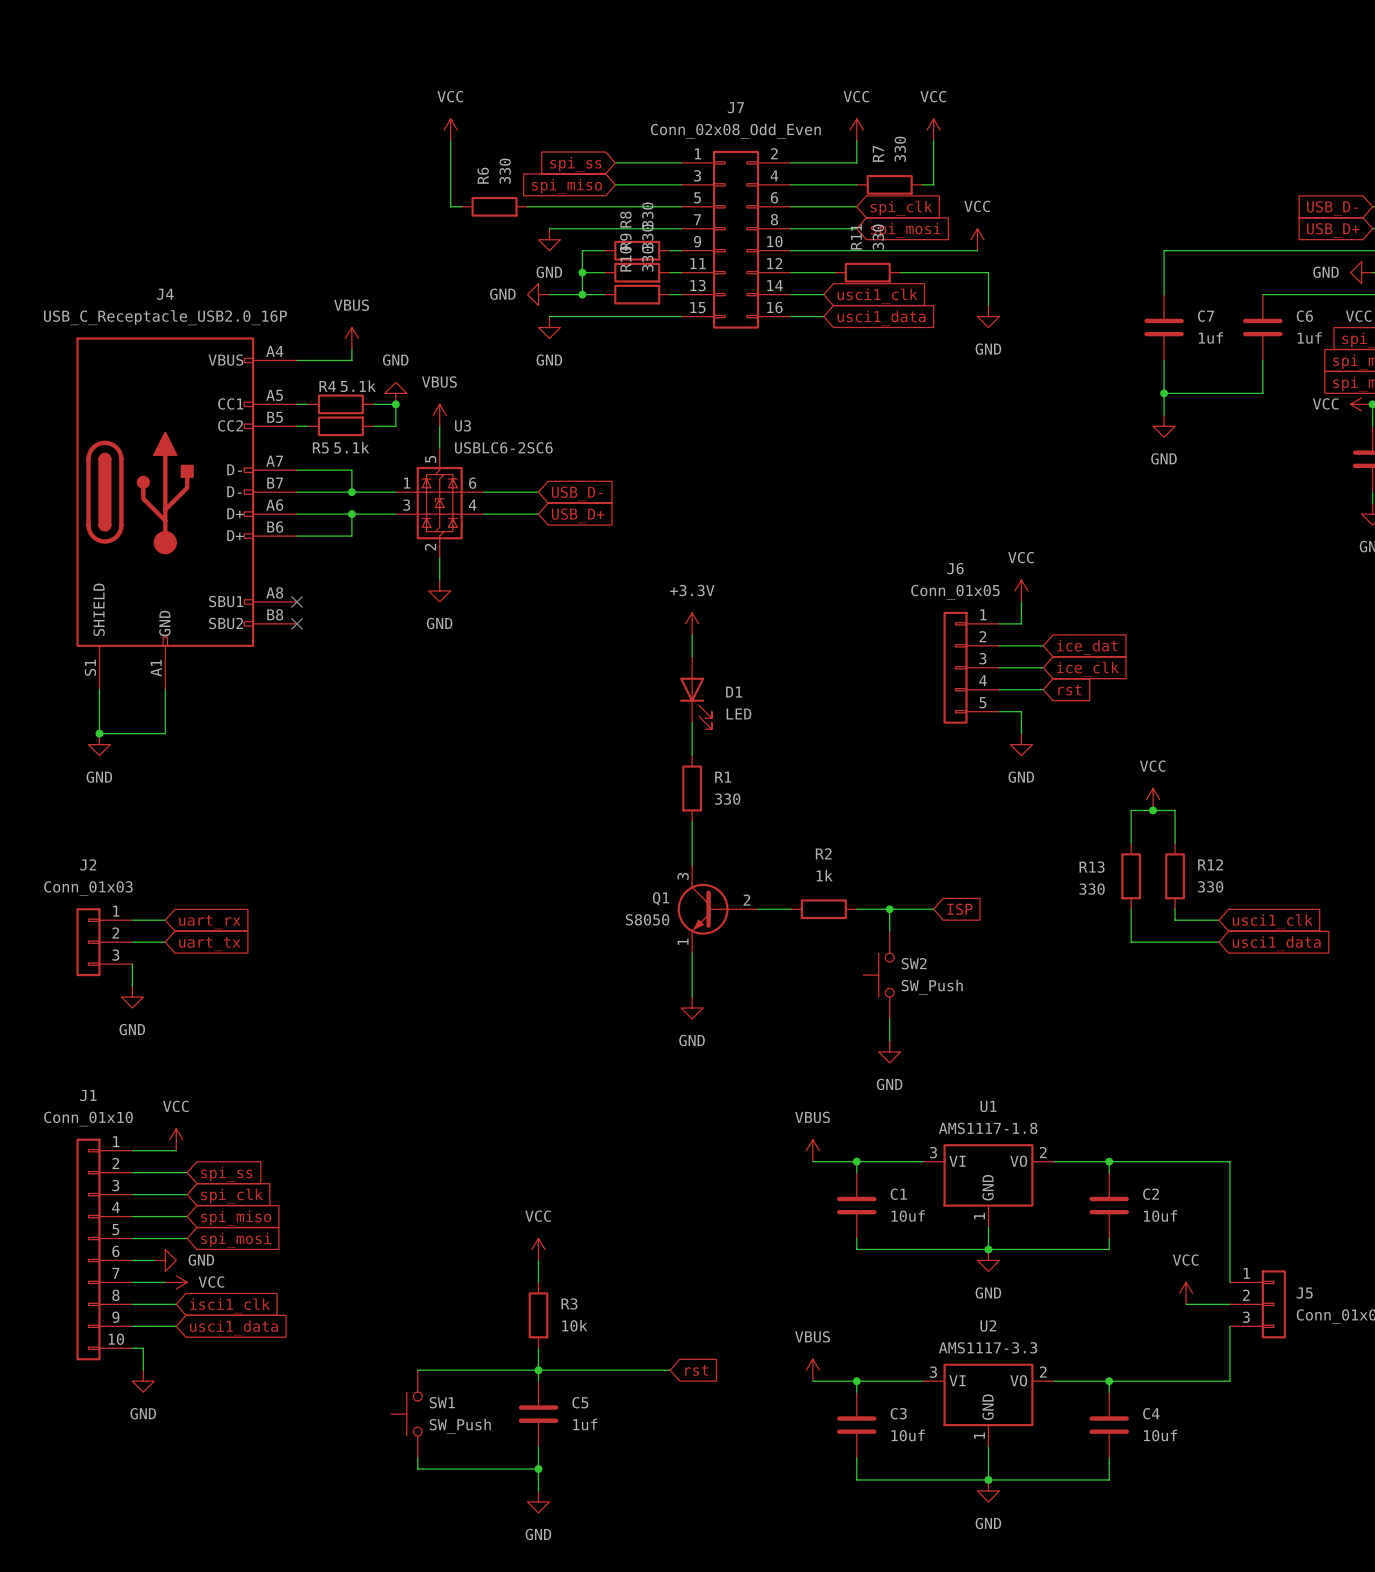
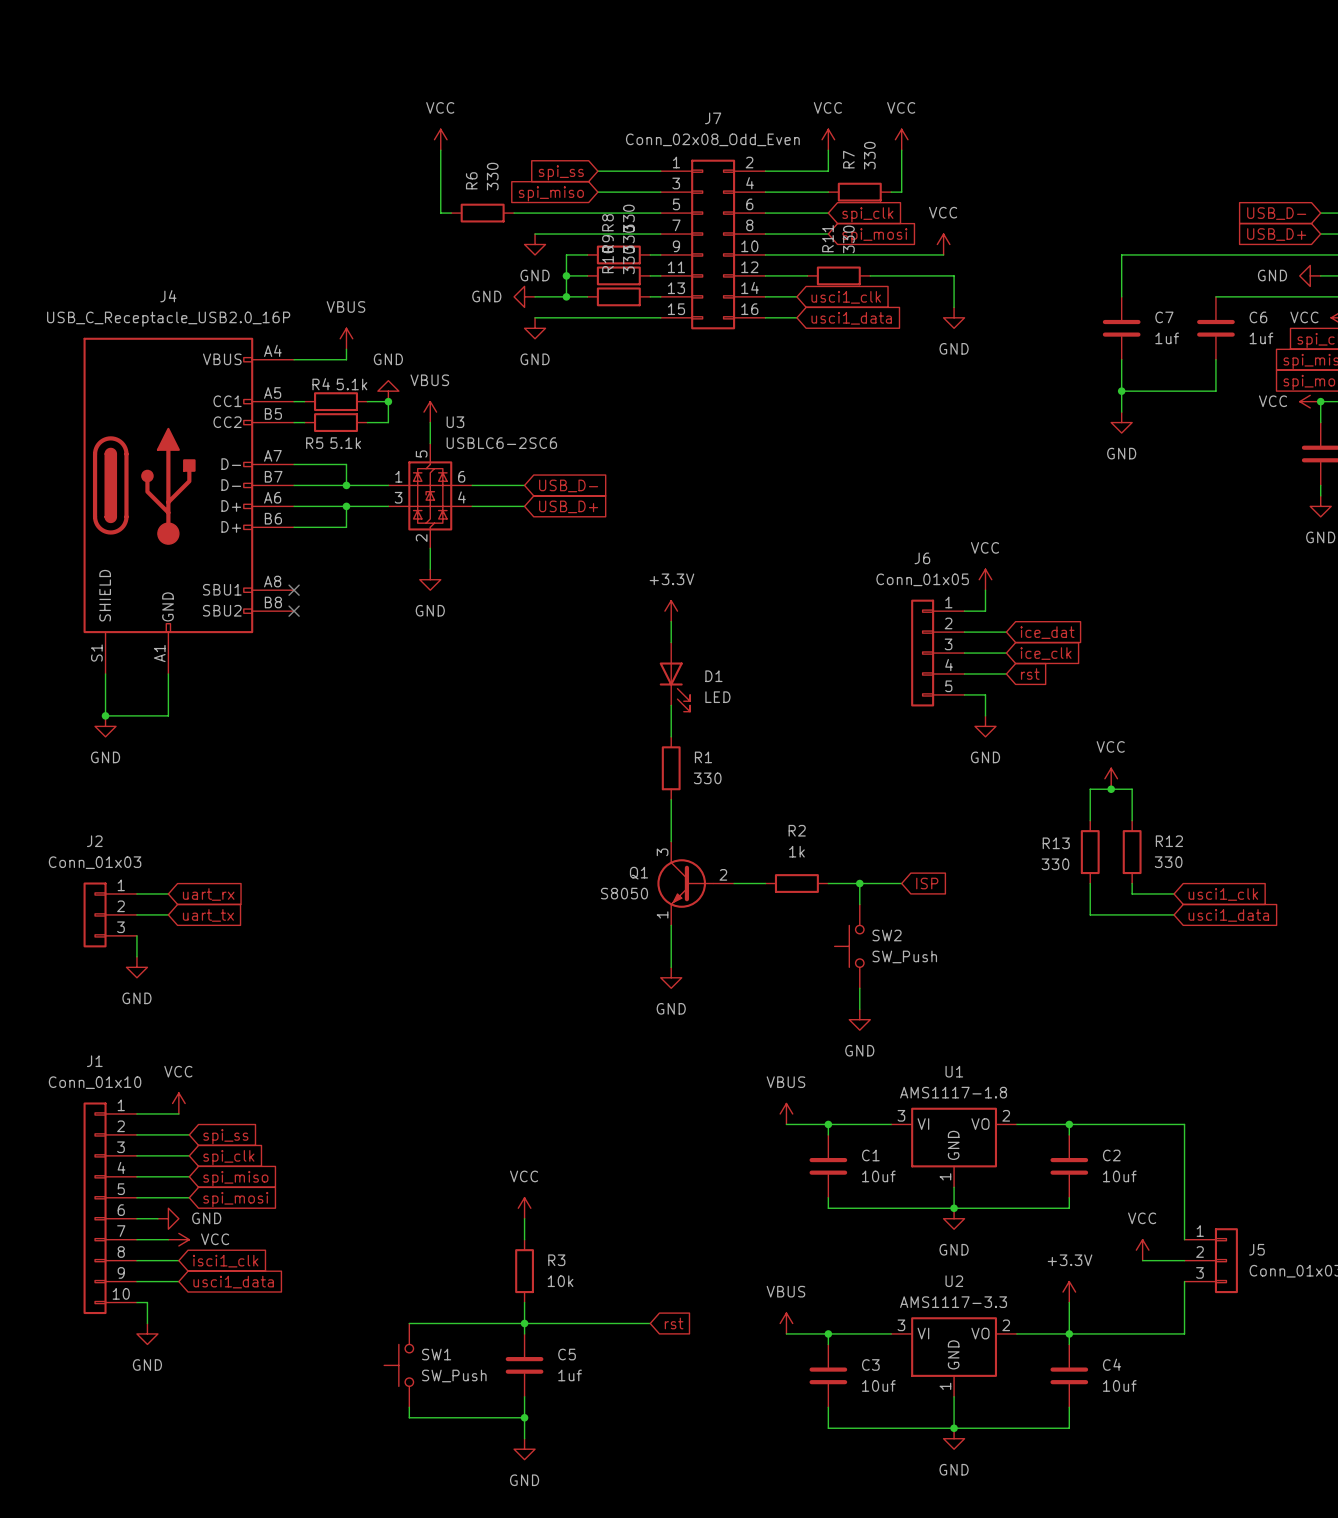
power symbol: none -> +3.3V (1069, 1292)
wire: none -> (1069, 1302) (1069, 1333)

